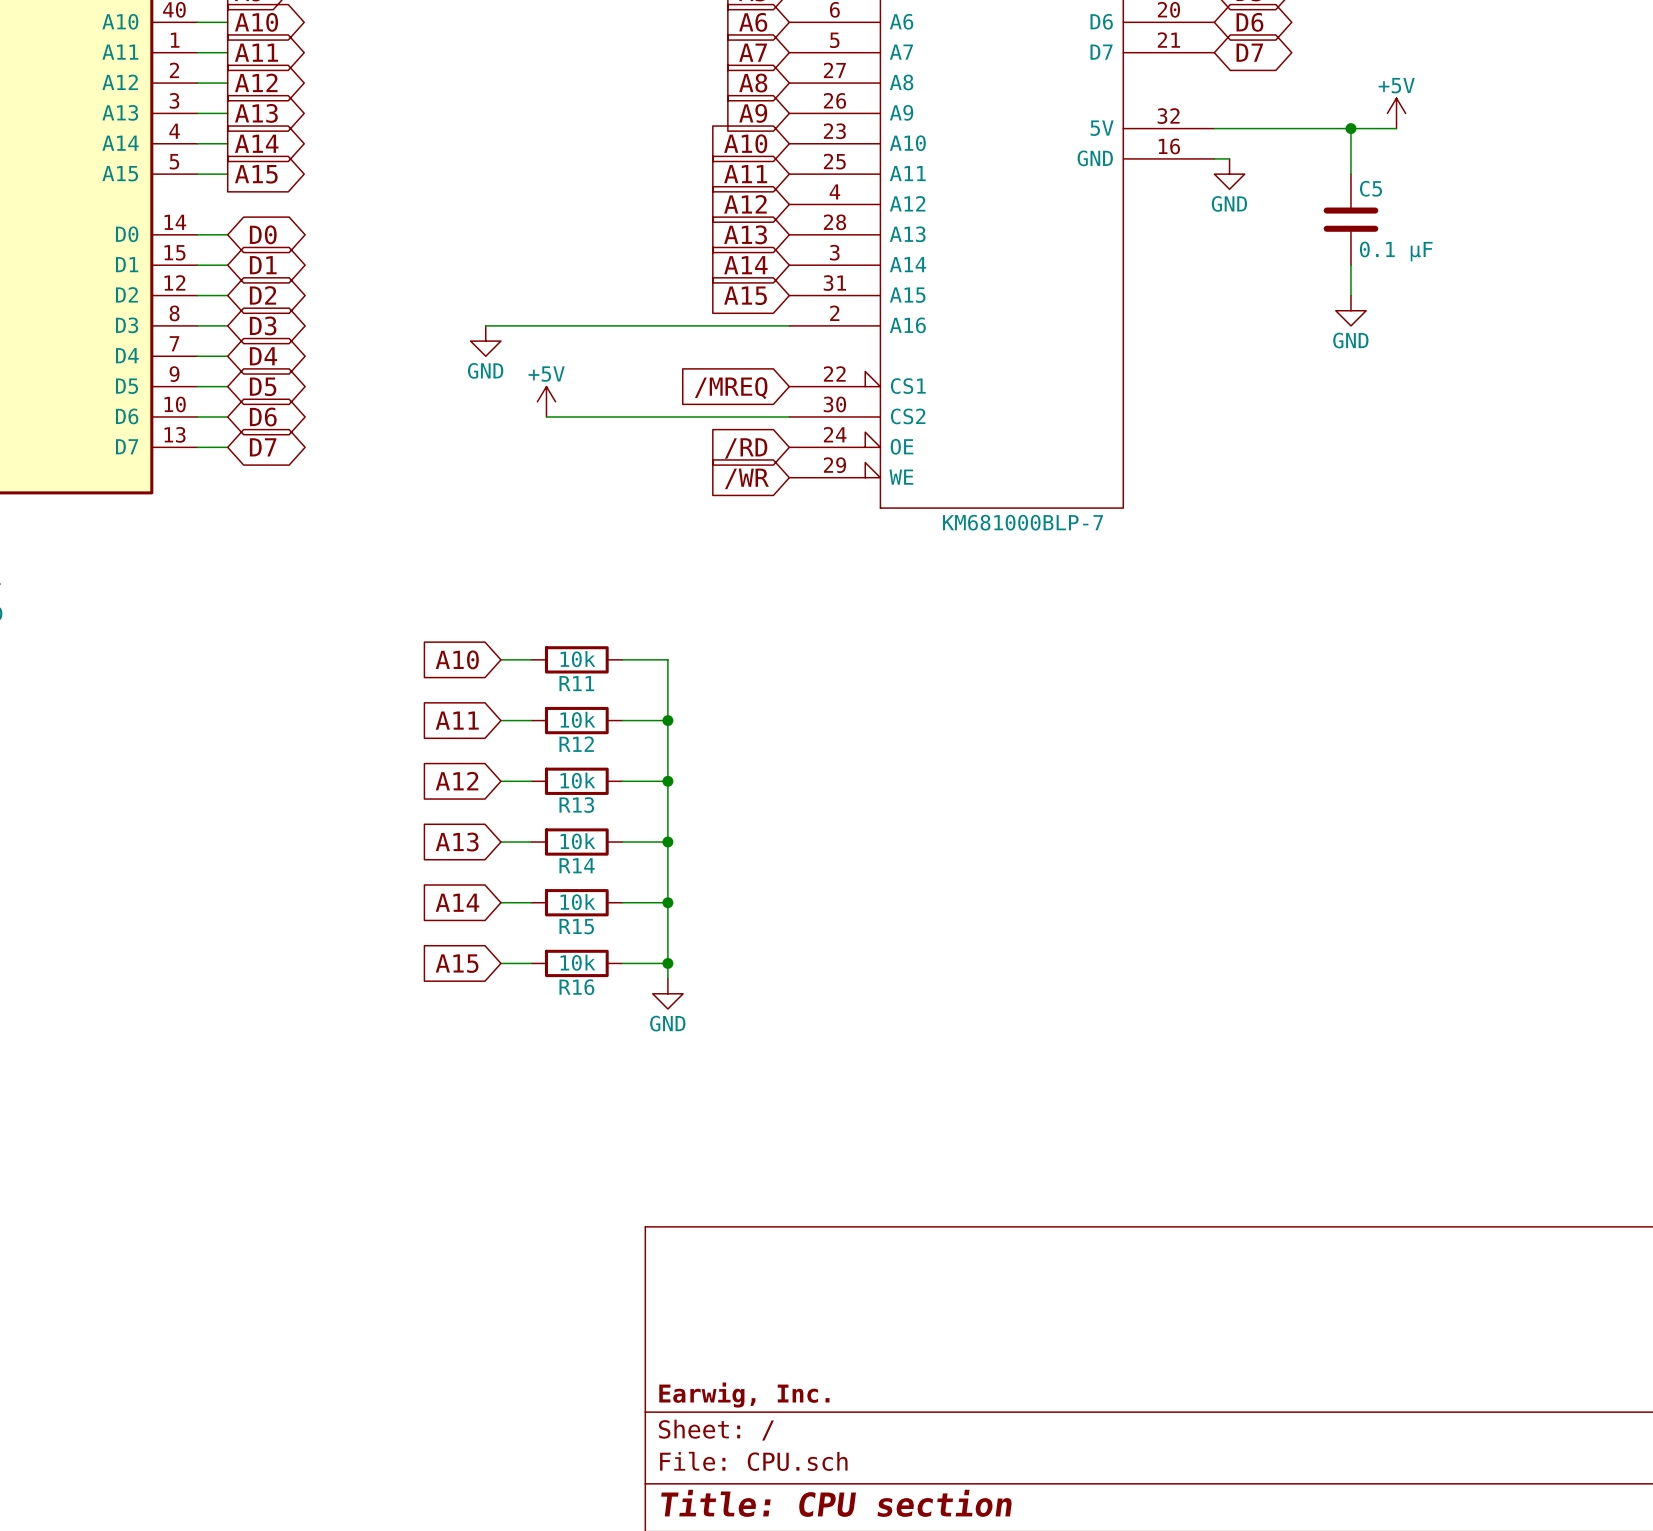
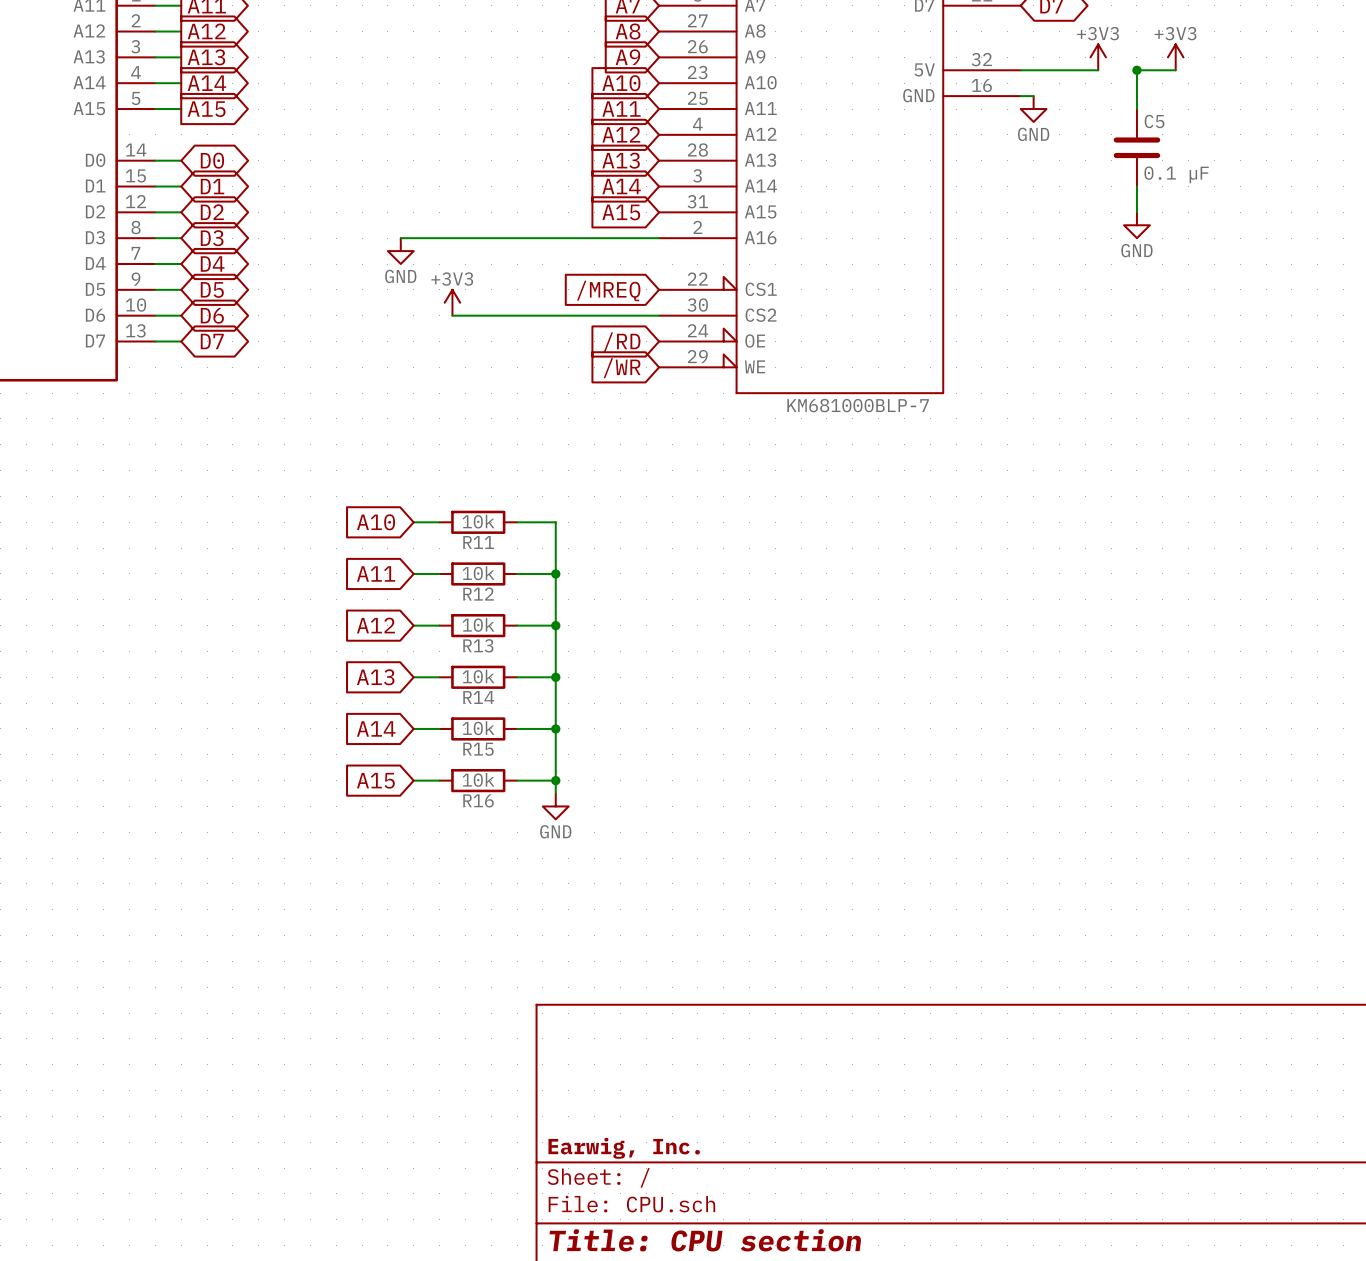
power symbol: none -> +3V3 (1098, 57)
power symbol: +5V (1396, 113) -> +3V3 (1175, 57)
wire: (1305, 128) (1350, 128) -> none
power symbol: +5V (546, 401) -> +3V3 (452, 302)

